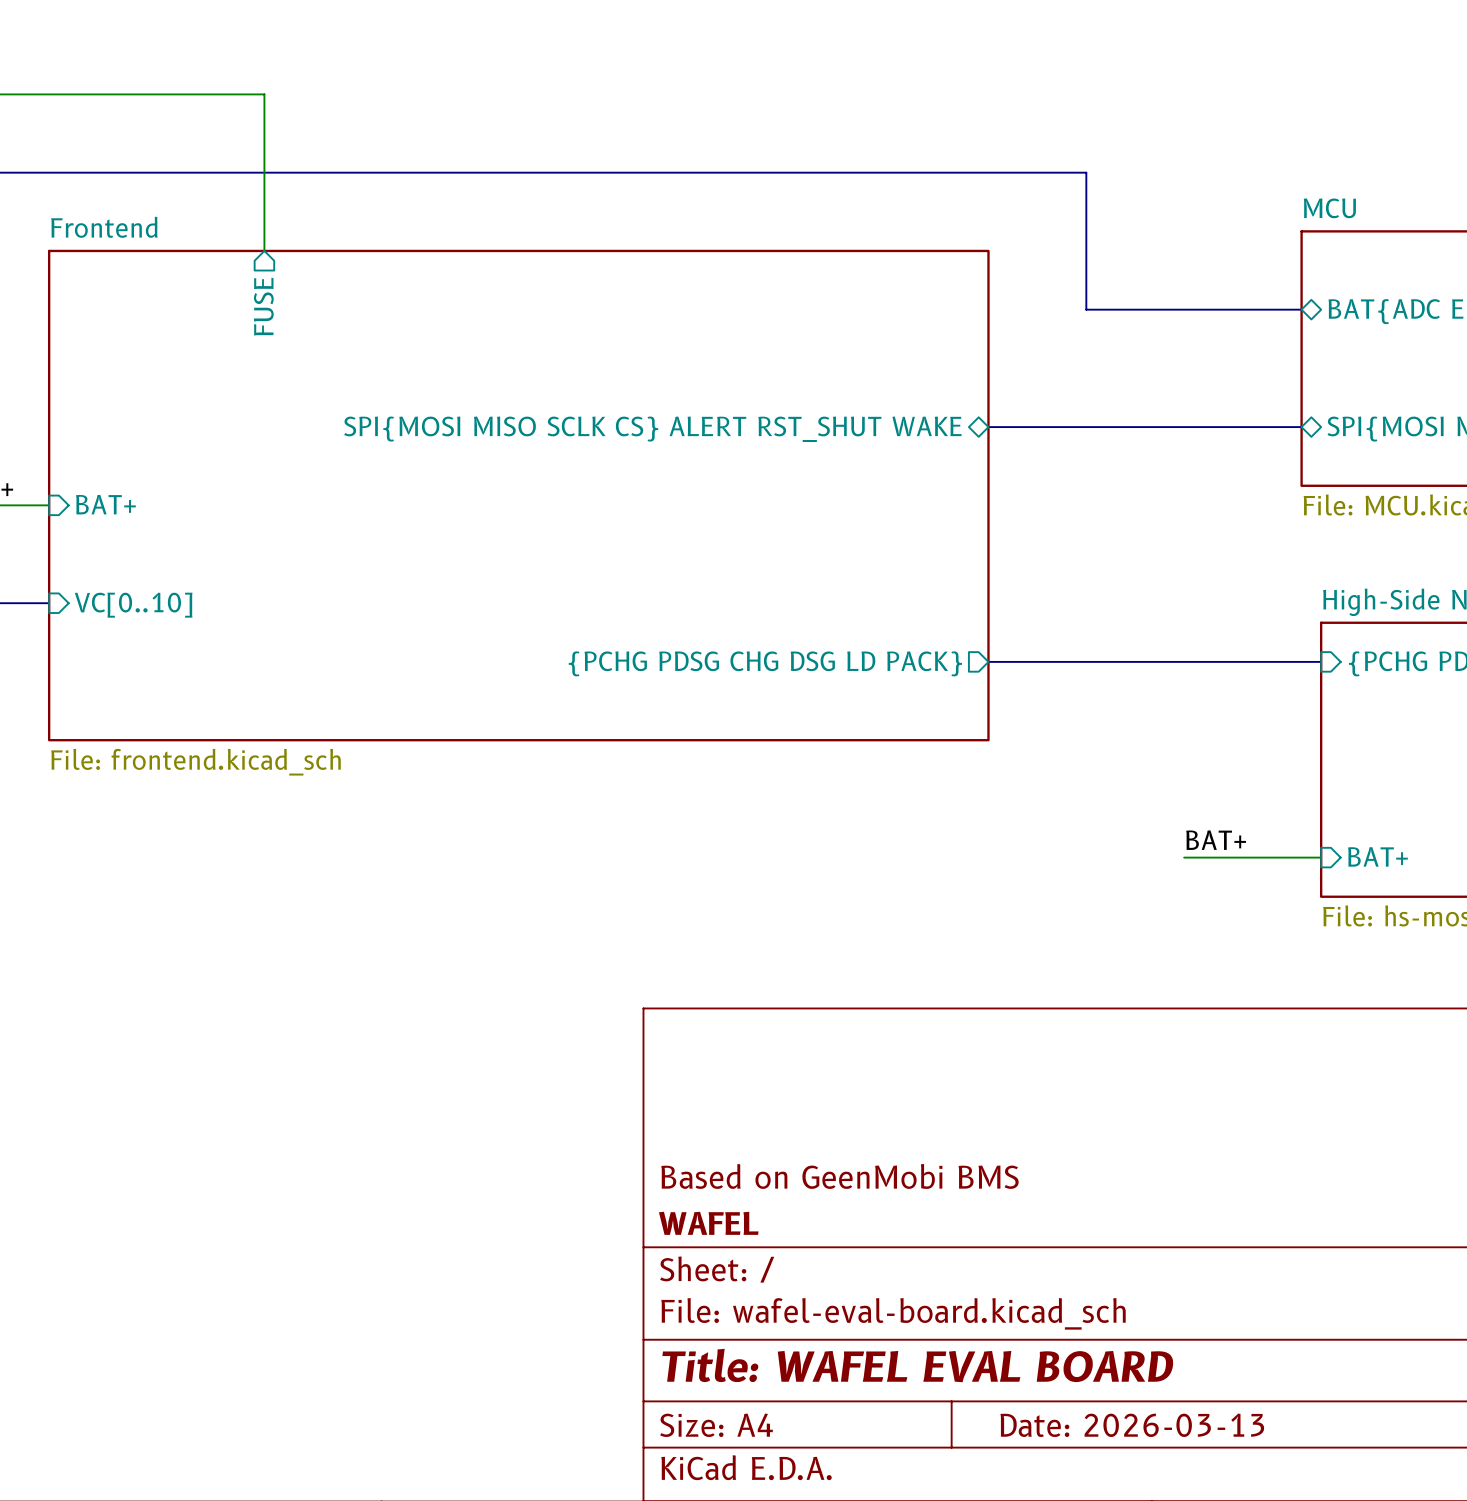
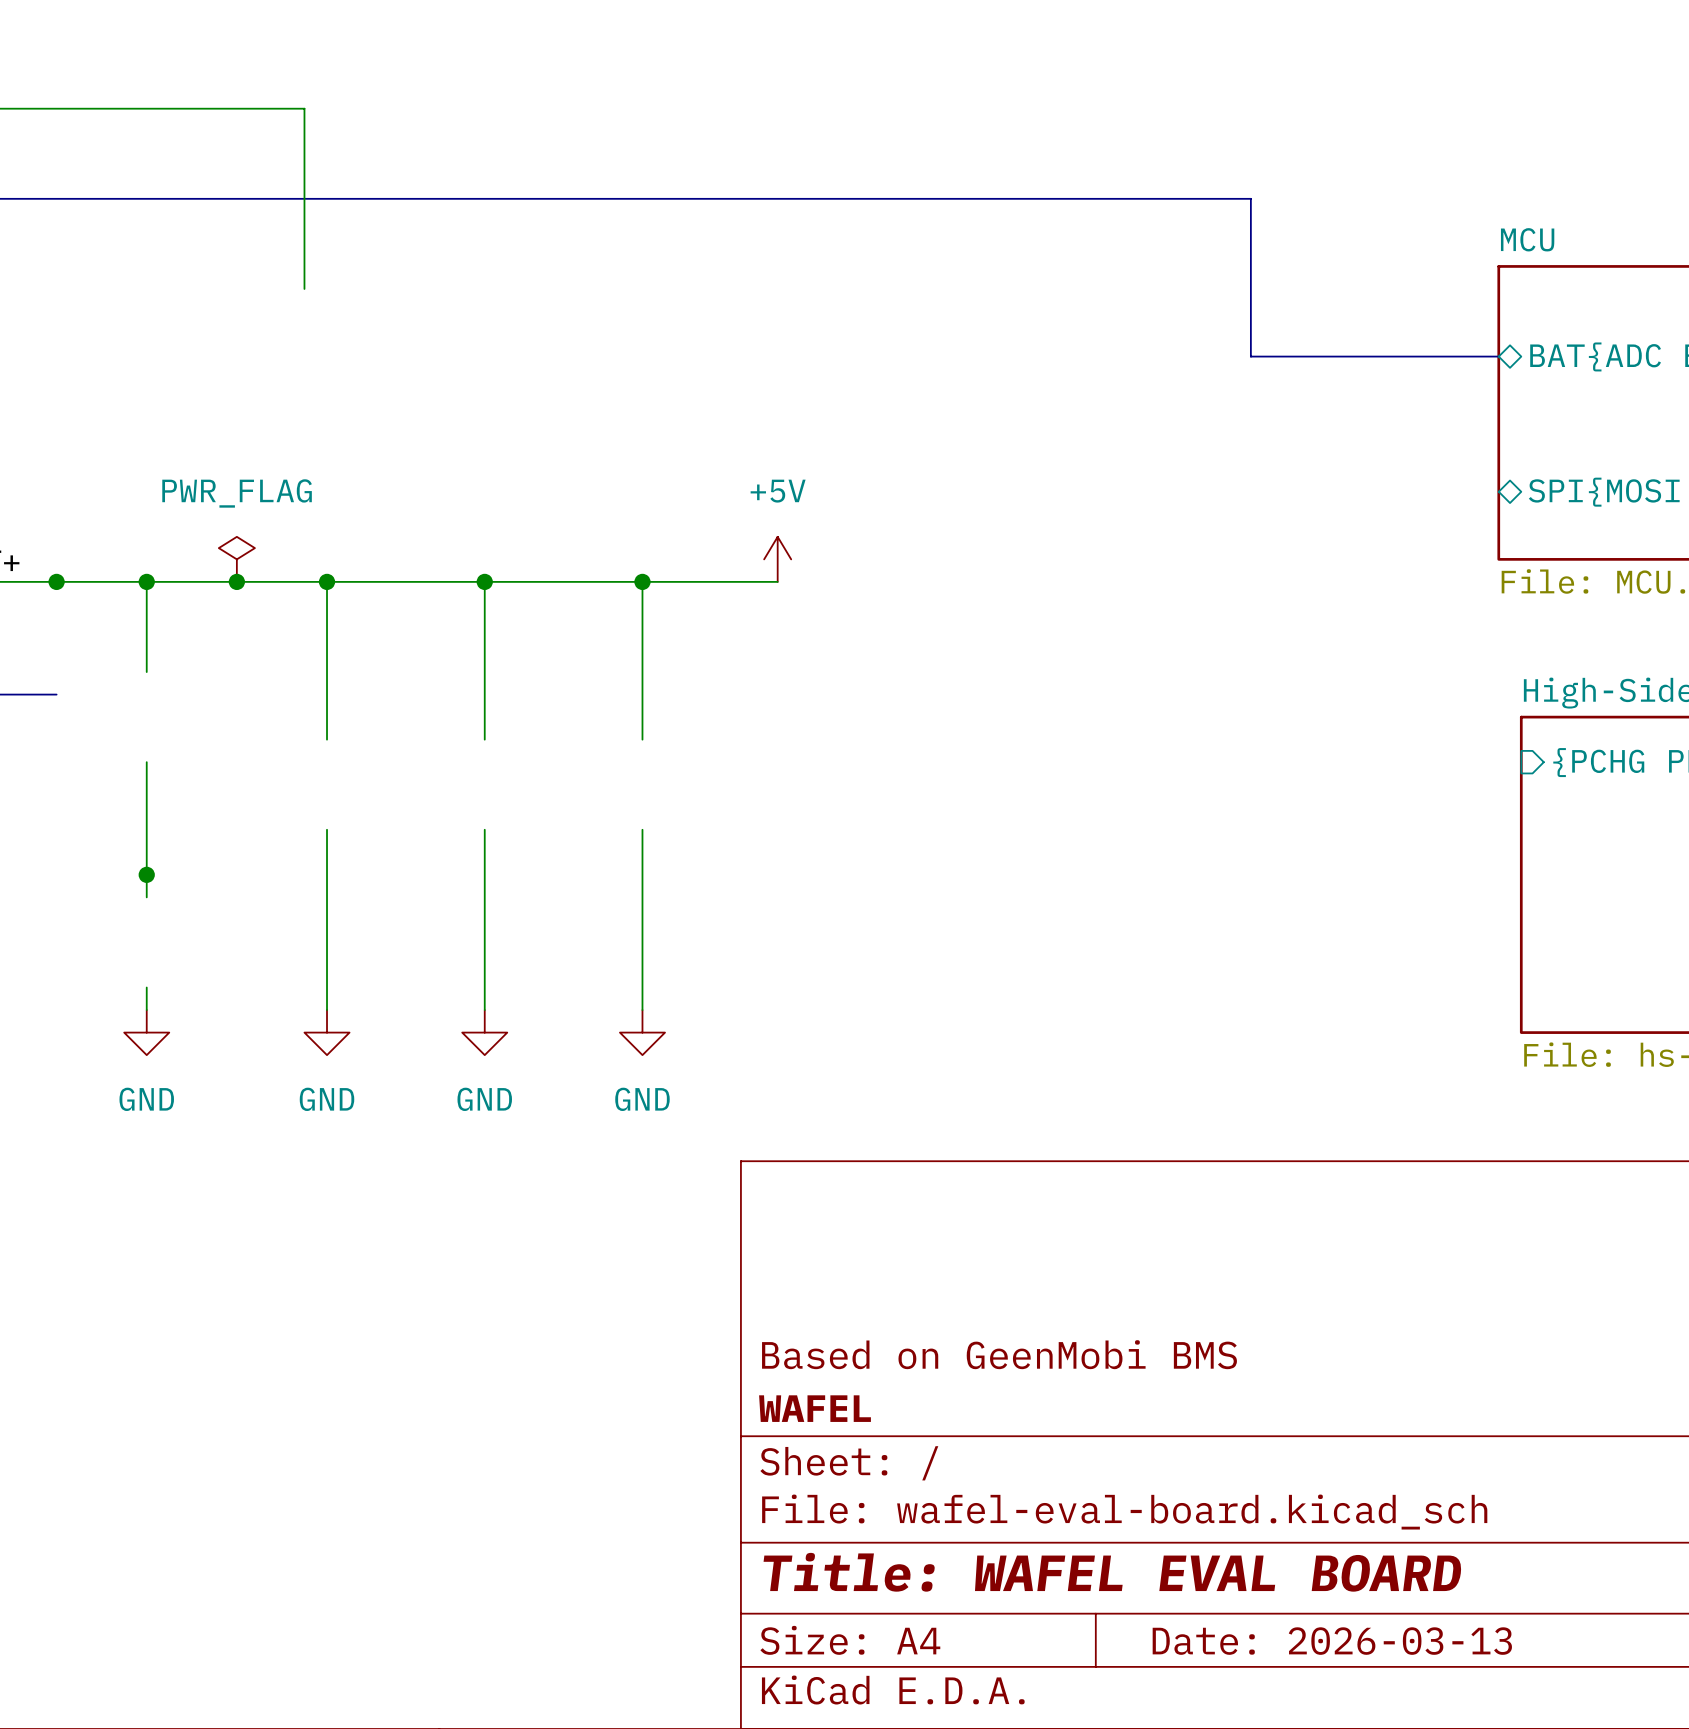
sheet pin: FUSE (263, 306) -> none
bus: (988, 427) (1301, 427) -> none
sheet pin: SPI{MOSI MISO SCLK CS} ALERT RST_SHUT WAKE (652, 429) -> none
power symbol: none -> PWR_FLAG (236, 559)
power symbol: none -> +5V (777, 559)
sheet Frontend: File: frontend.kicad_sch (518, 495) -> none
sheet pin: BAT+ (105, 504) -> none
wire: none -> (56, 581) (777, 581)
junction: none -> (56, 581)
wire: none -> (146, 581) (146, 672)
junction: none -> (146, 581)
junction: none -> (236, 581)
wire: none -> (327, 581) (327, 739)
junction: none -> (327, 581)
wire: none -> (484, 581) (484, 739)
junction: none -> (484, 581)
wire: none -> (642, 581) (642, 739)
junction: none -> (642, 581)
sheet pin: VC[0..10] (133, 605) -> none
wire: none -> (146, 762) (146, 897)
bus: (988, 661) (1321, 661) -> none
sheet pin: {PCHG PDSG CHG DSG LD PACK} (765, 663) -> none
wire: none -> (327, 829) (327, 1010)
wire: none -> (484, 829) (484, 1010)
wire: none -> (642, 829) (642, 1010)
junction: none -> (146, 874)
label: BAT+ (1216, 840) -> none
sheet pin: BAT+ (1377, 856) -> none
wire: none -> (146, 987) (146, 1010)
wire: (1184, 857) (1321, 857) -> none
power symbol: none -> GND (146, 1032)
power symbol: none -> GND (327, 1032)
power symbol: none -> GND (484, 1032)
power symbol: none -> GND (642, 1032)

